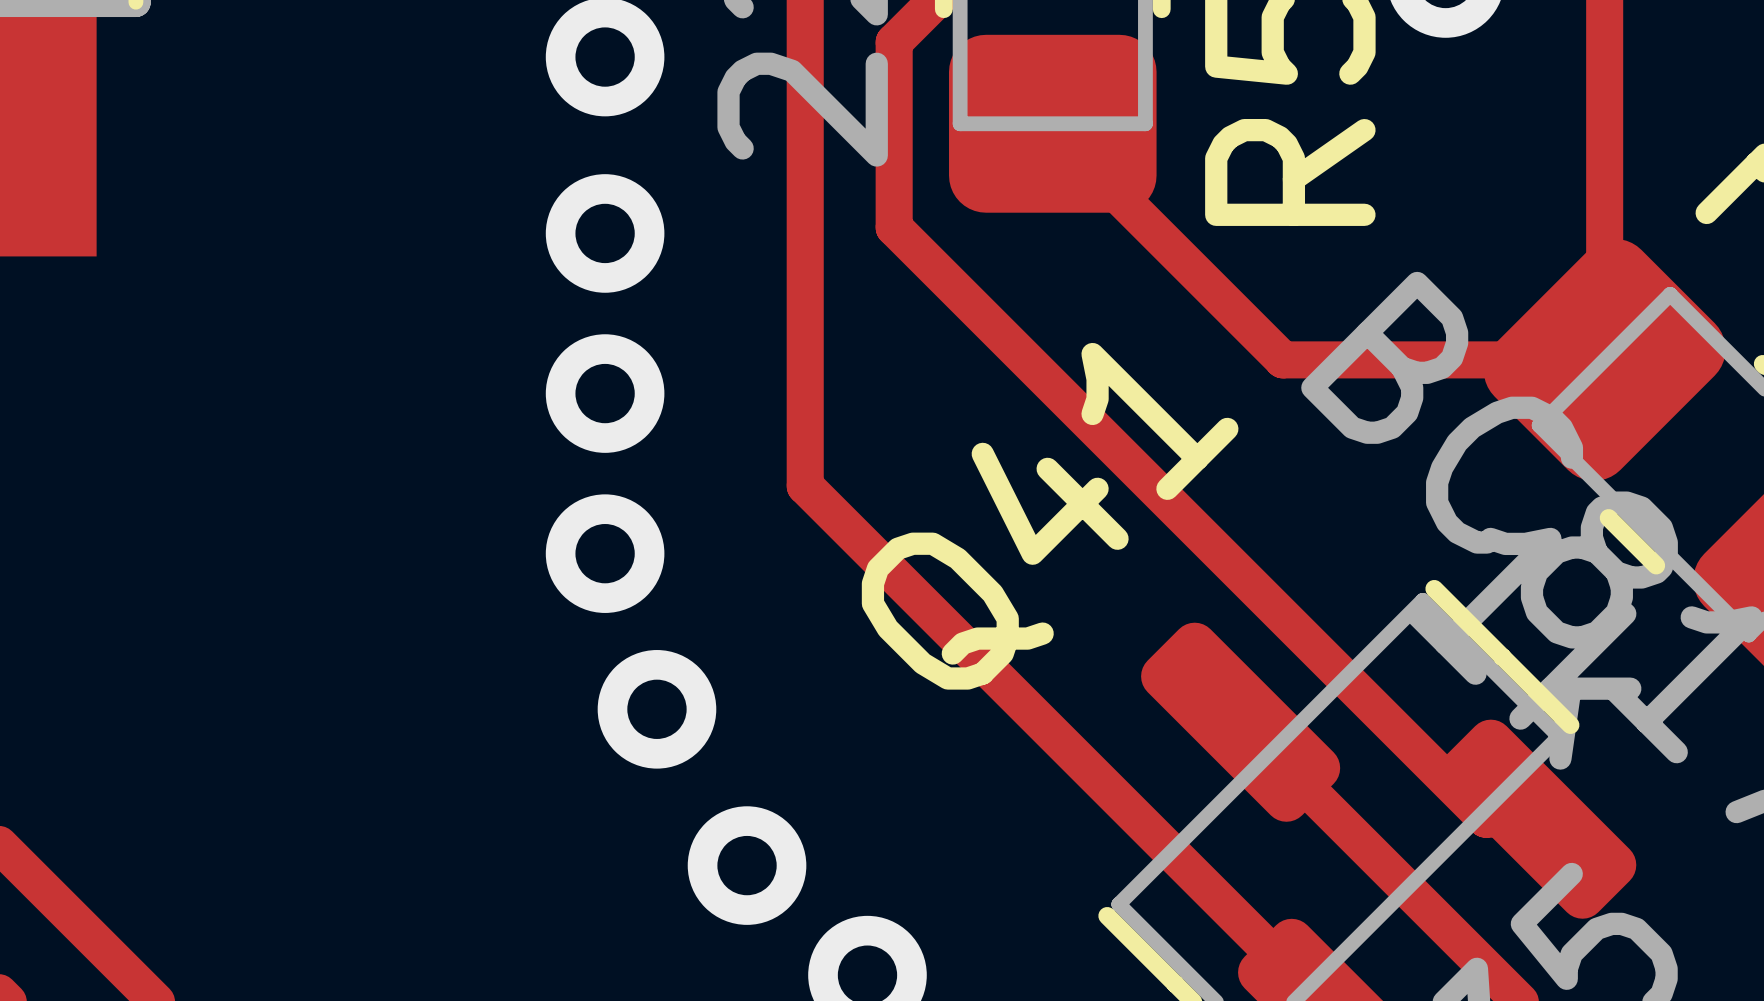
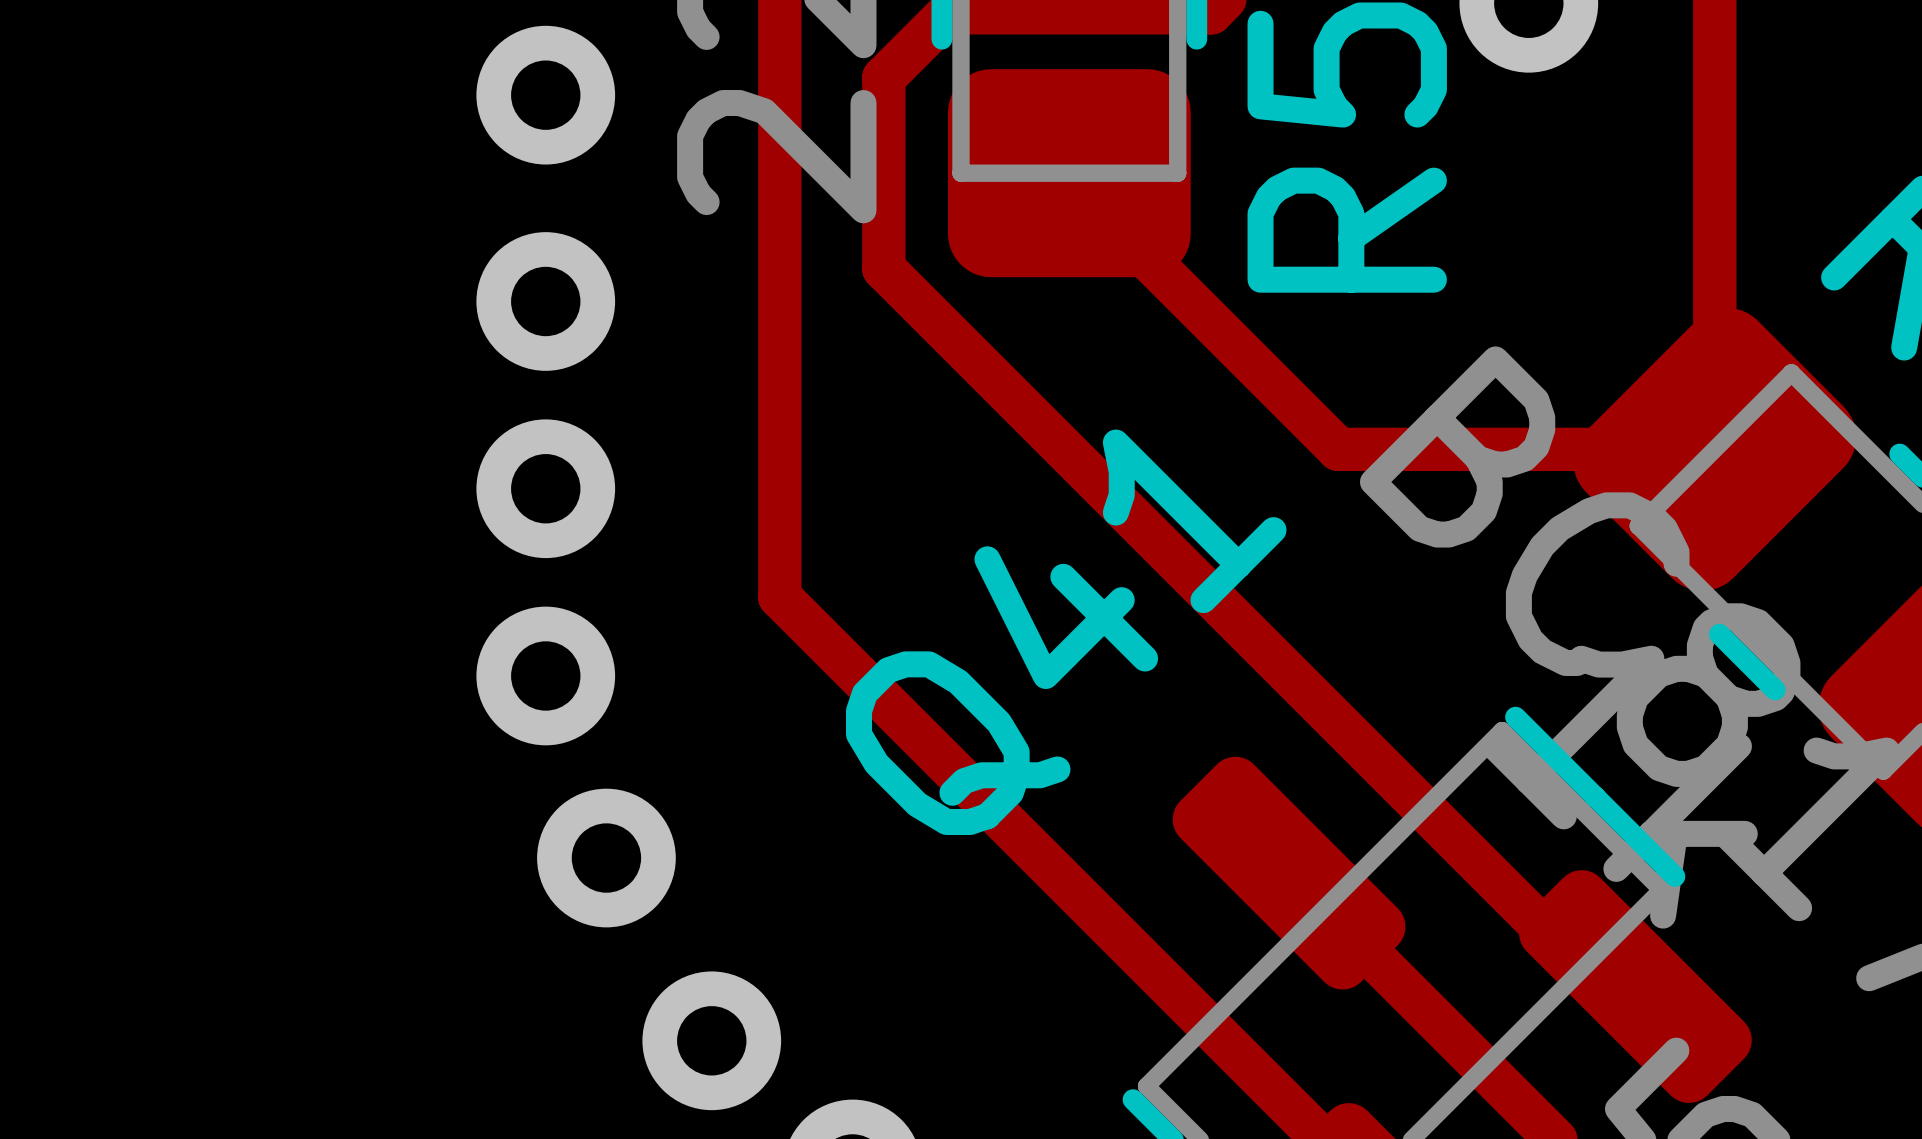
top track: (894, 205) (894, 227) (1485, 819) (1508, 819) -> (883, 268) (1601, 986)

